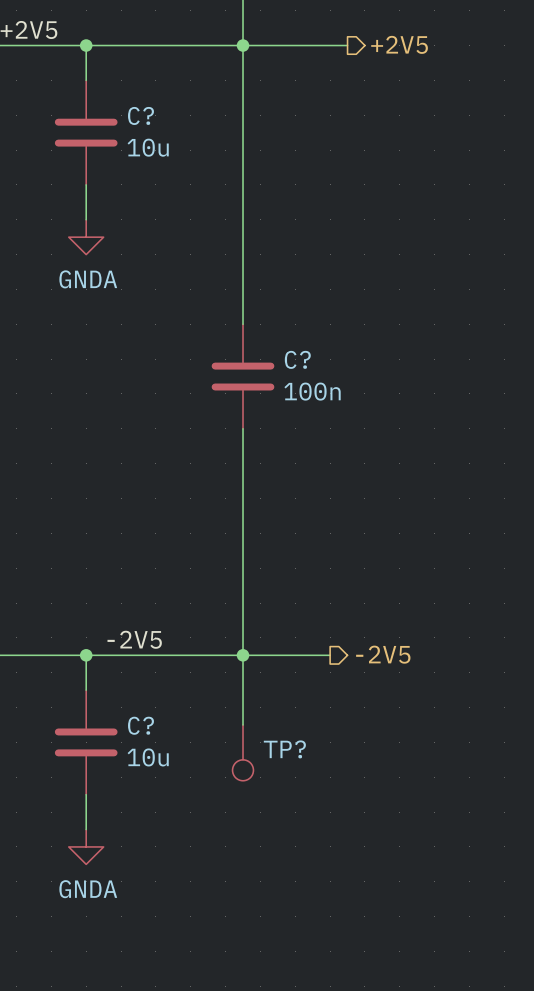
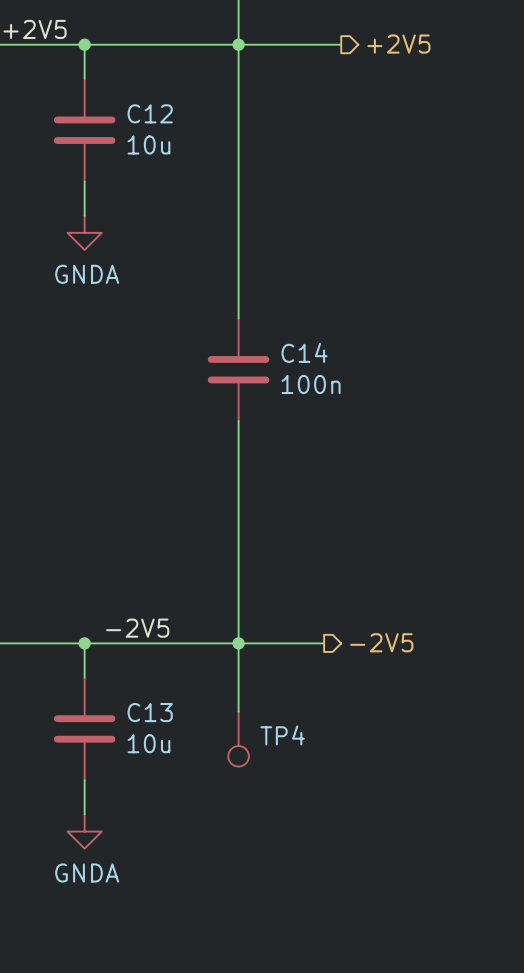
C? name: C? (141, 115) -> C12 (150, 113)
C? name: C? (297, 359) -> C14 (304, 352)
C? name: C? (141, 725) -> C13 (150, 712)
TP? name: TP? (284, 749) -> TP4 (282, 735)

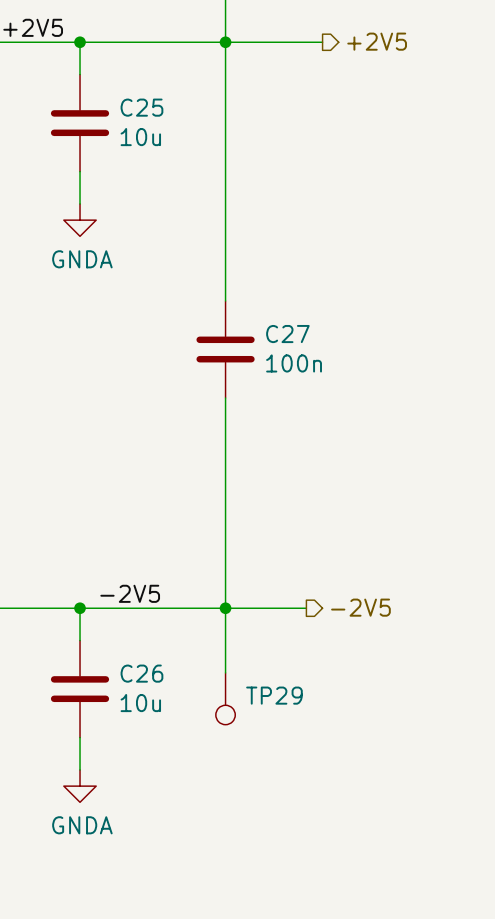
C12 name: C12 (150, 113) -> C25 (141, 107)
C14 name: C14 (304, 352) -> C27 (287, 334)
C13 name: C13 (150, 712) -> C26 (141, 673)
TP4 name: TP4 (282, 735) -> TP29 (274, 695)

